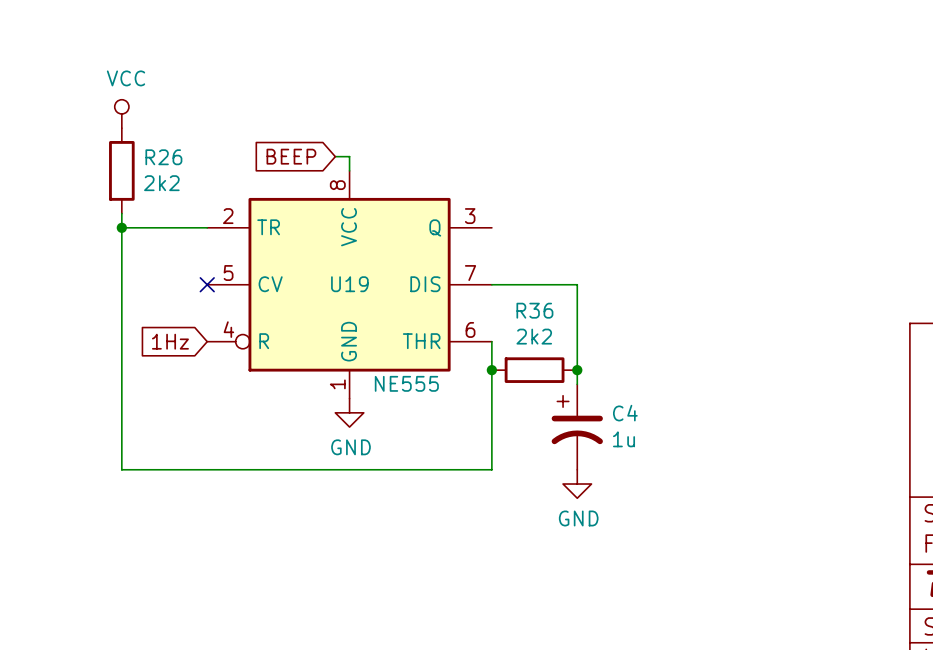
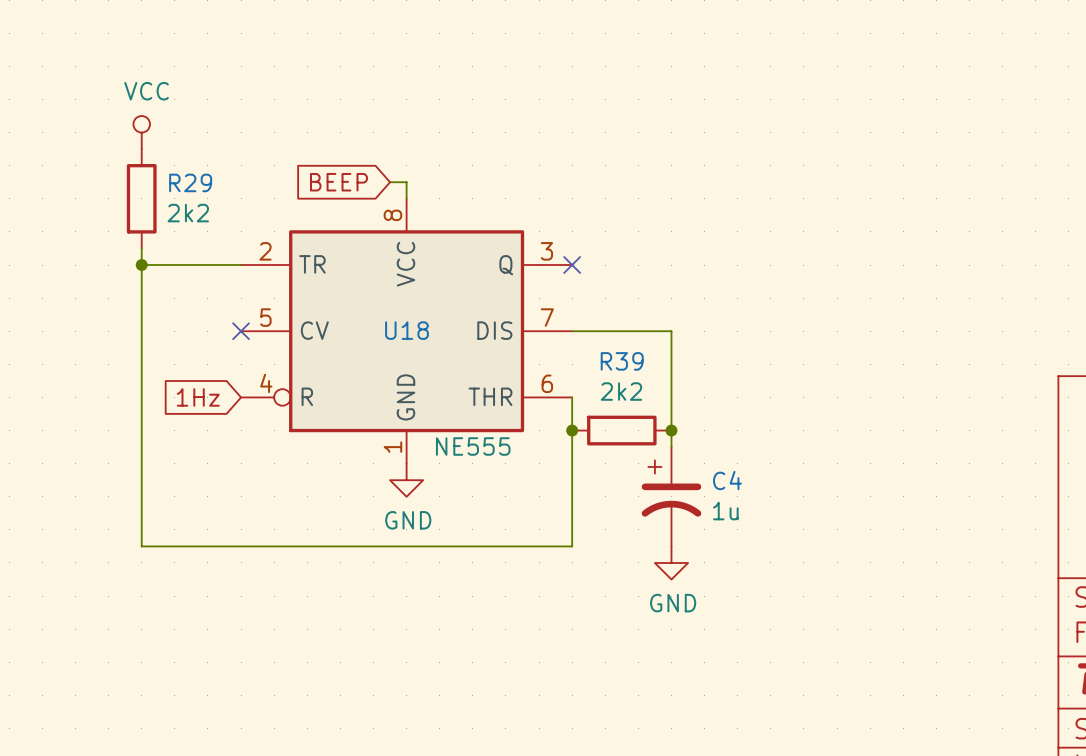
R26 name: R26 (163, 157) -> R29 (190, 182)
no-connect mark: none -> (572, 265)
U19 name: U19 (349, 284) -> U18 (407, 330)
R36 name: R36 (534, 310) -> R39 (622, 361)

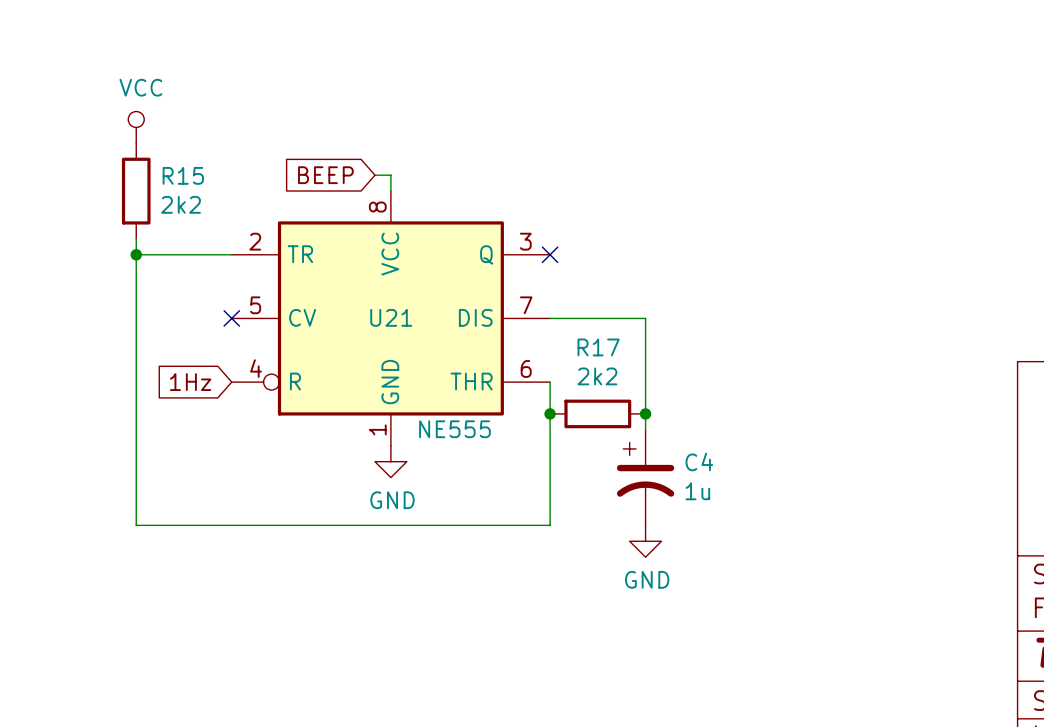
R29 name: R29 (190, 182) -> R15 (183, 175)
U18 name: U18 (407, 330) -> U21 (391, 317)
R39 name: R39 (622, 361) -> R17 (598, 347)

